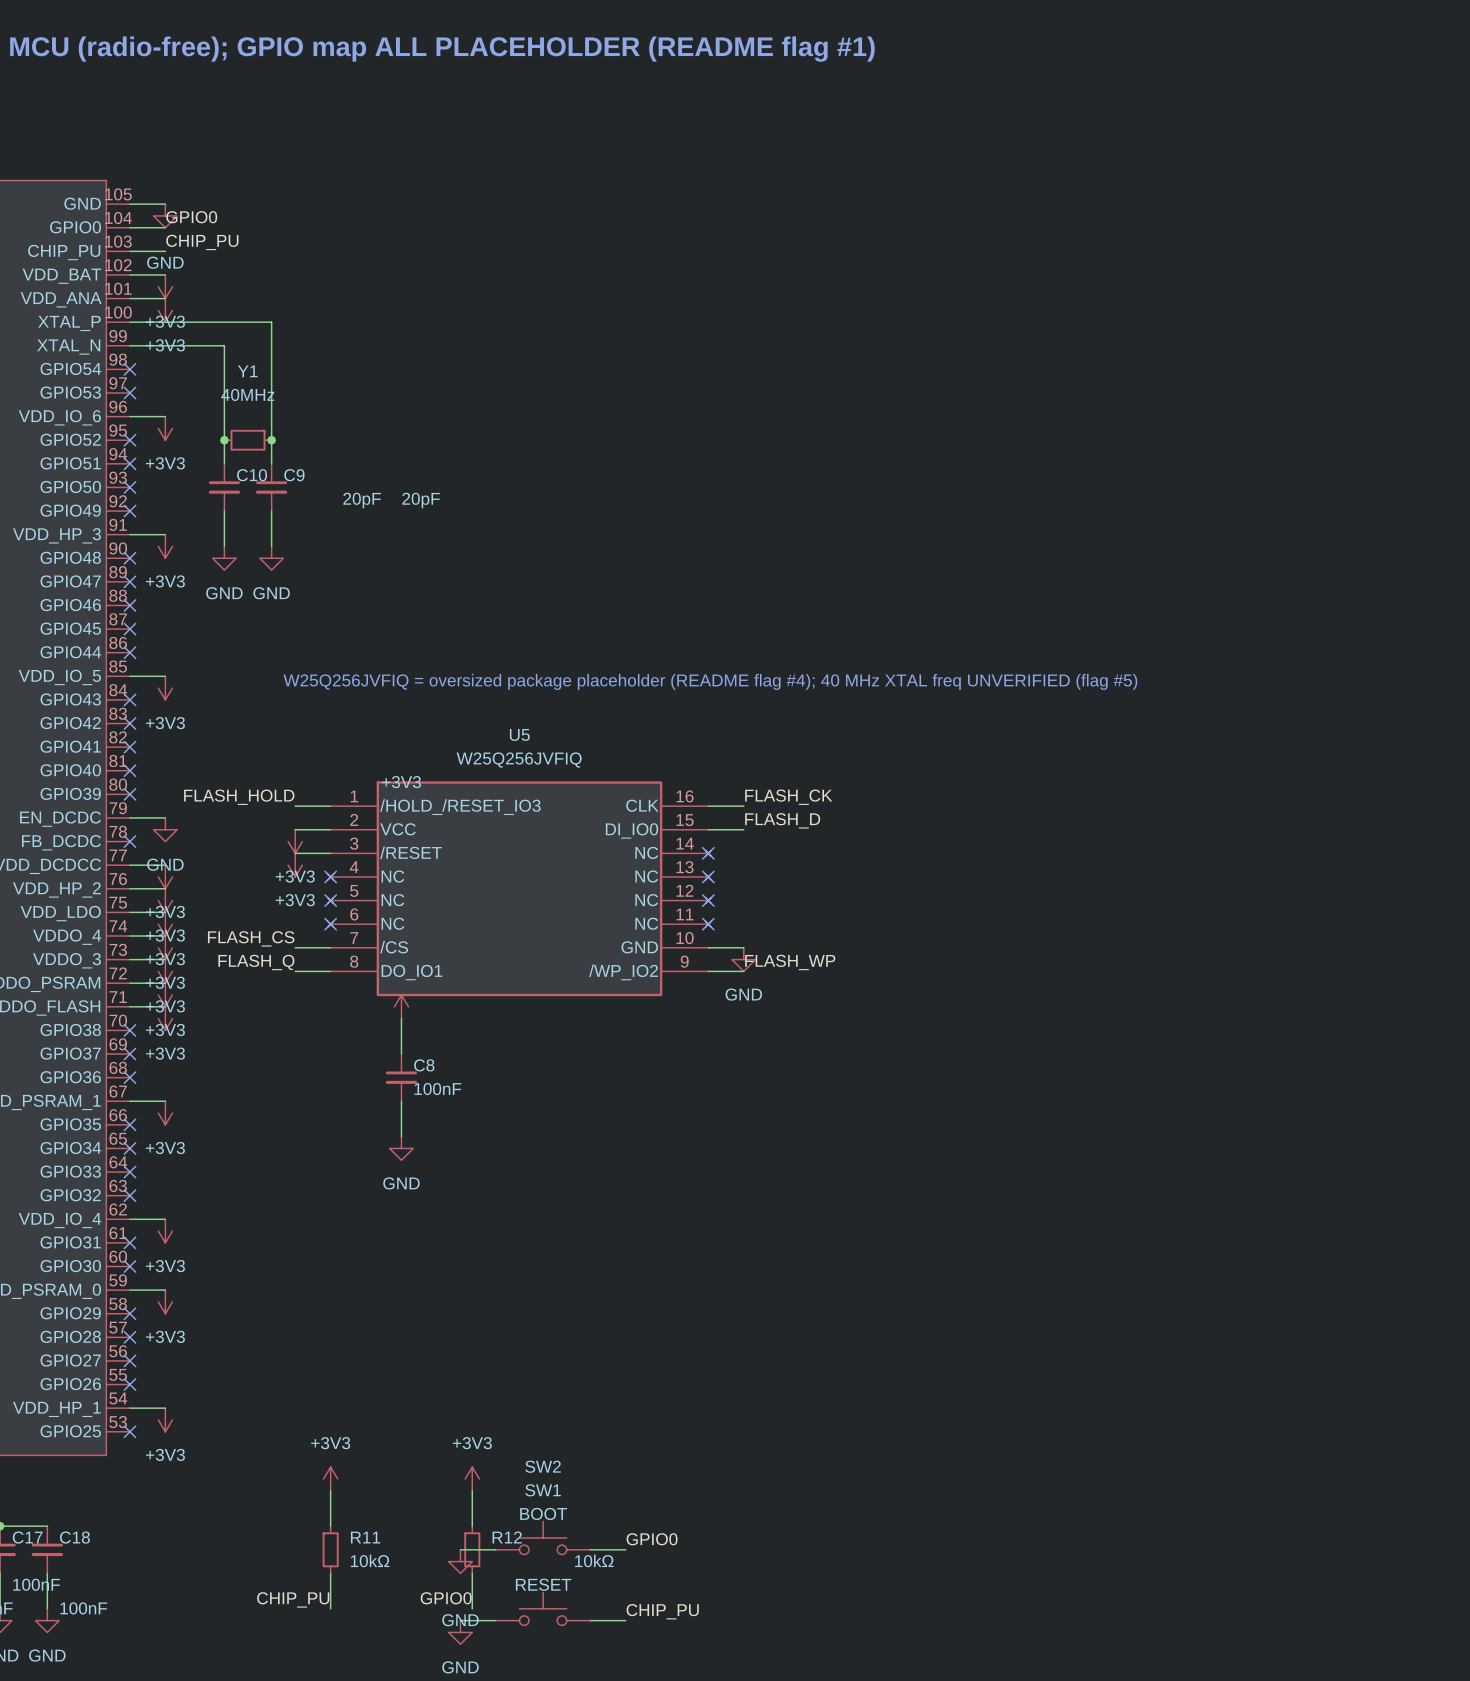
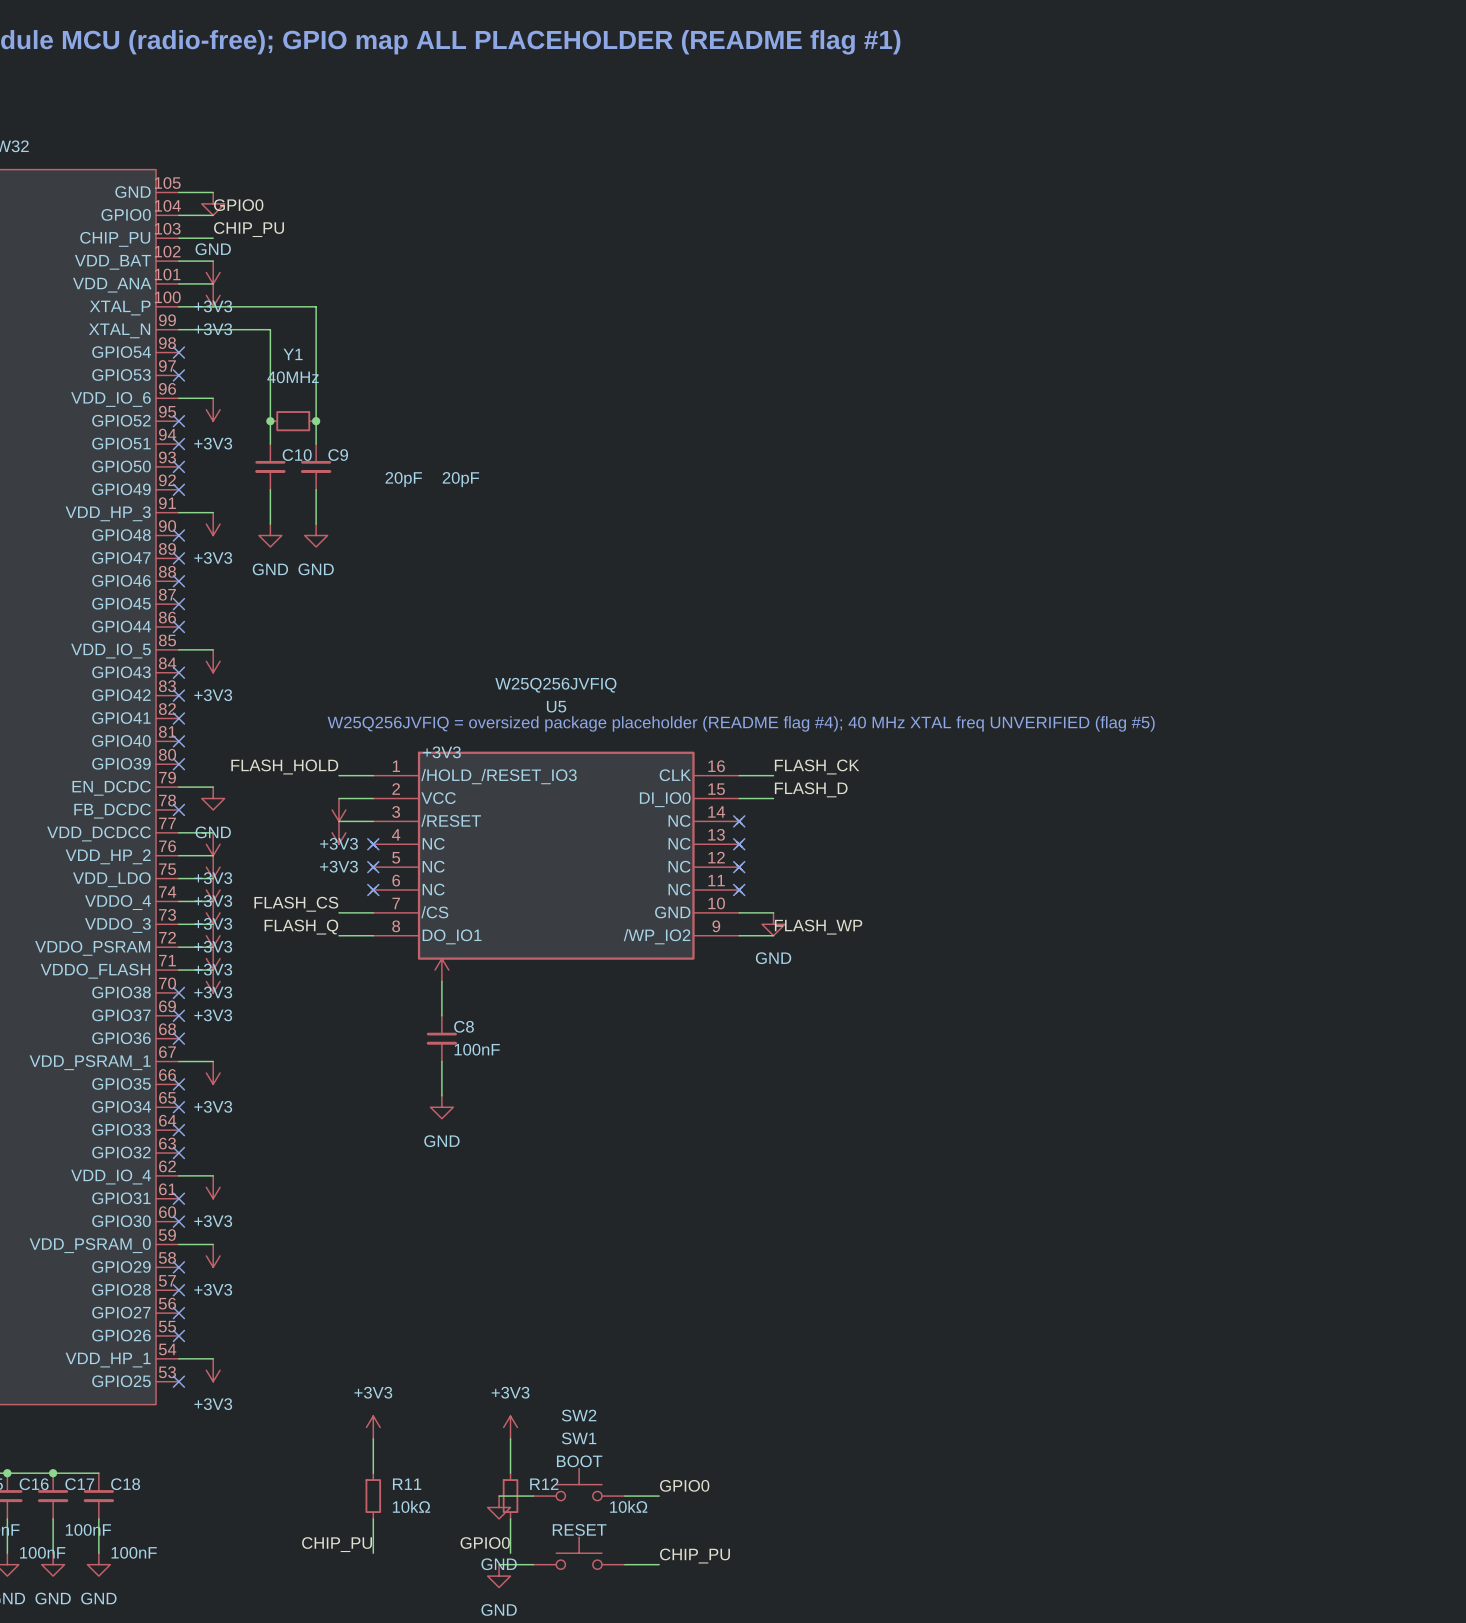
text position: W25Q256JVFIQ = oversized package placeholder (README flag #4); 40 MHz XTAL freq UNVERIFIED (flag #5) (710, 681) -> W25Q256JVFIQ = oversized package placeholder (README flag #4); 40 MHz XTAL freq UNVERIFIED (flag #5) (741, 723)
U5 value position: W25Q256JVFIQ (519, 760) -> W25Q256JVFIQ (555, 685)

